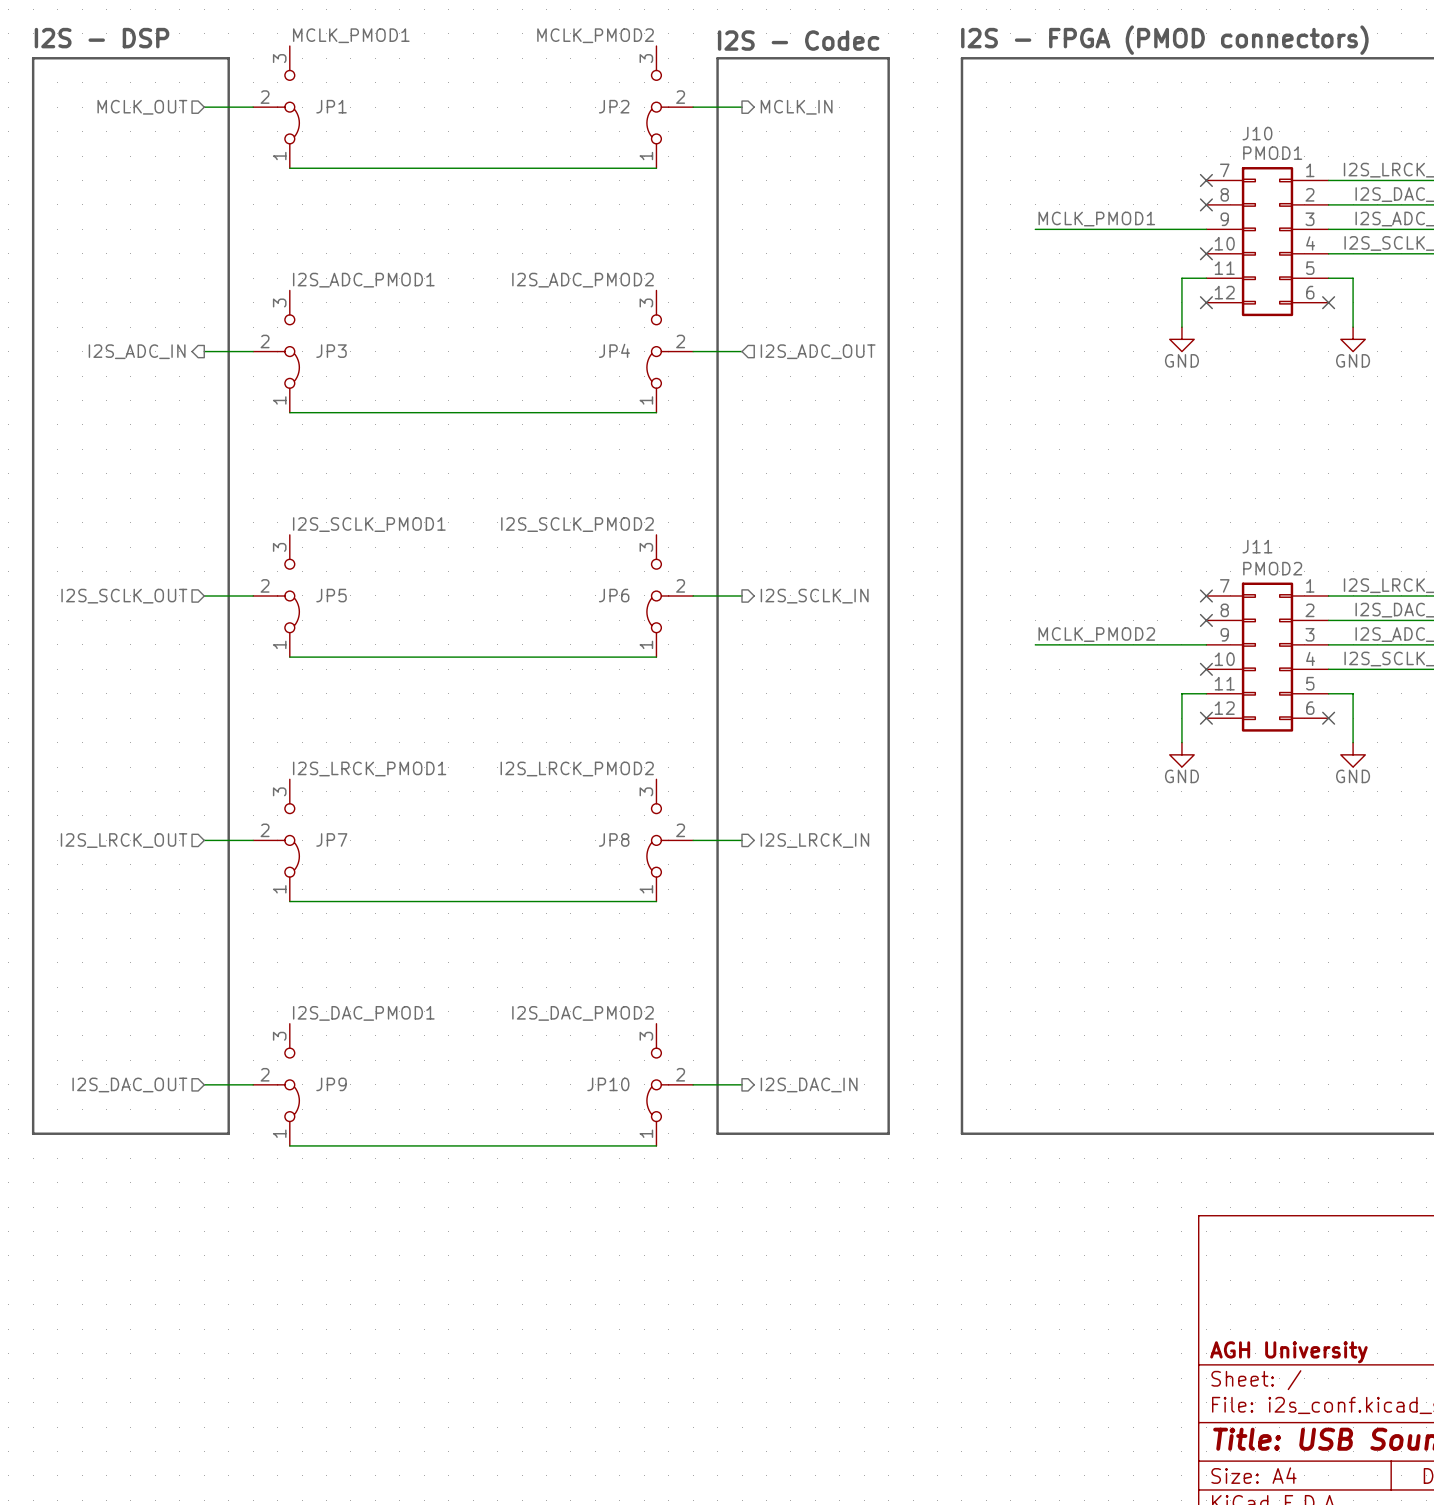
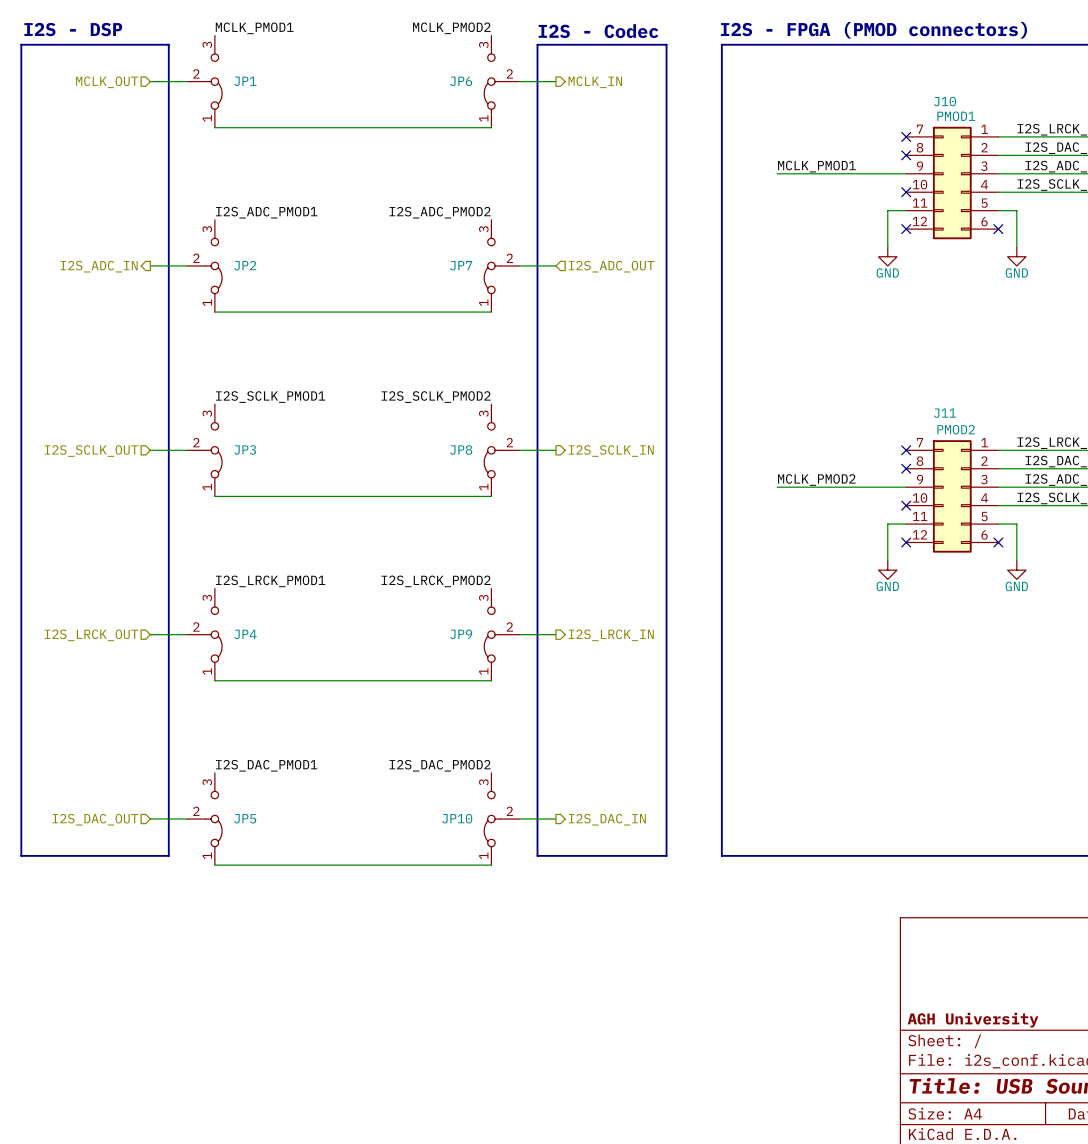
JP2 name: JP2 (614, 106) -> JP6 (461, 81)
JP4 name: JP4 (614, 350) -> JP7 (461, 265)
JP3 name: JP3 (331, 351) -> JP2 (245, 265)
JP5 name: JP5 (331, 595) -> JP3 (245, 449)
JP6 name: JP6 (614, 595) -> JP8 (461, 449)
JP7 name: JP7 (331, 839) -> JP4 (245, 634)
JP8 name: JP8 (614, 839) -> JP9 (461, 634)
JP9 name: JP9 (331, 1084) -> JP5 (245, 818)

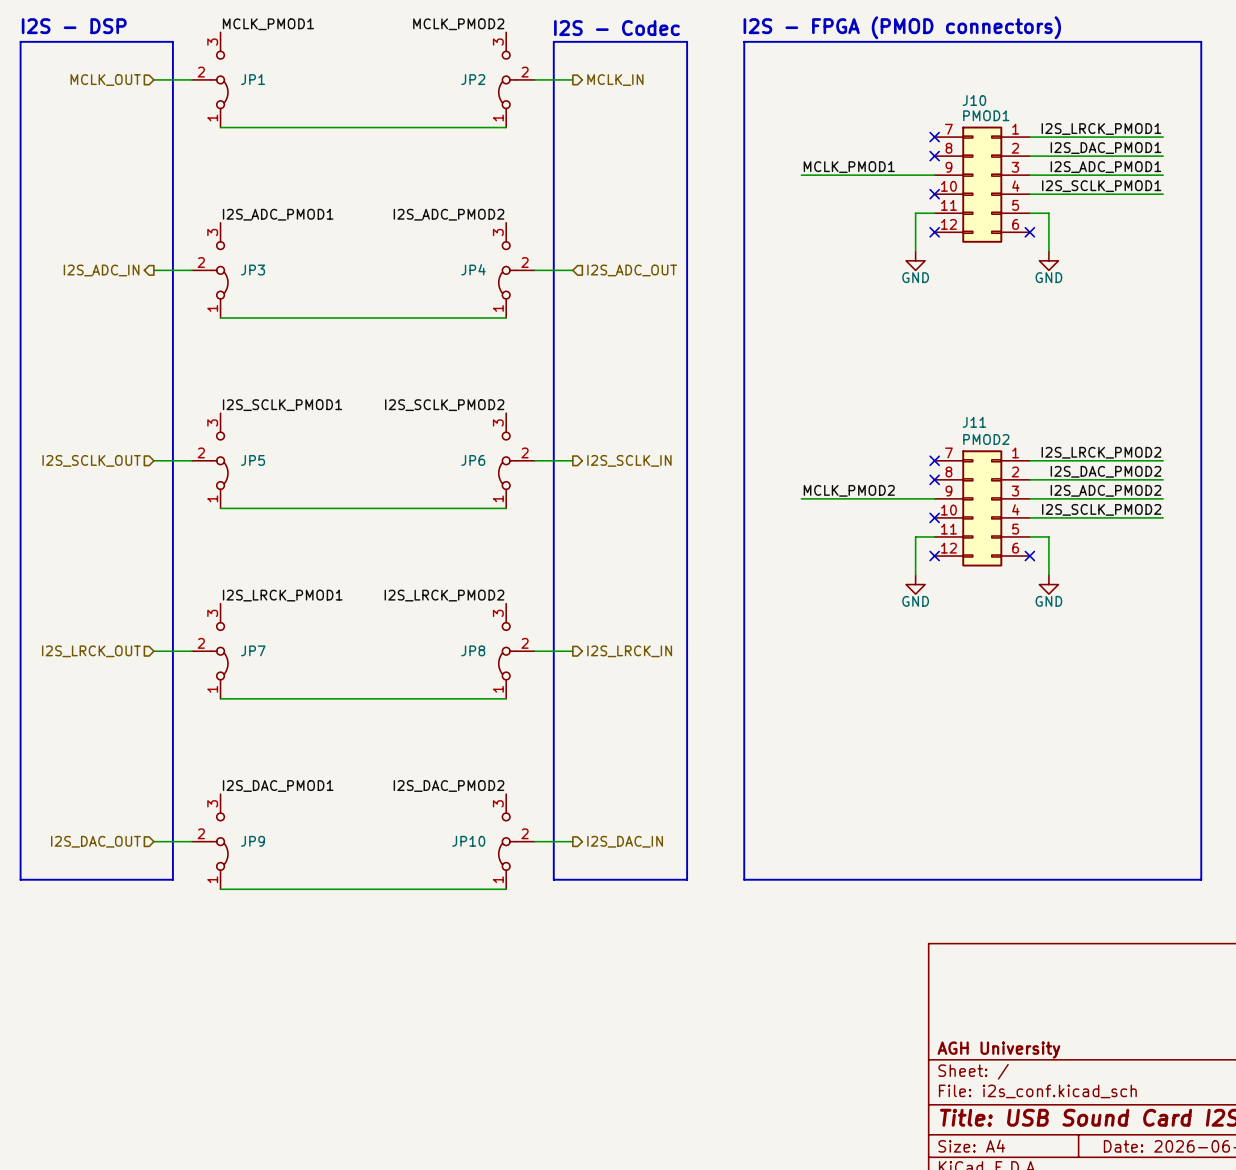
JP6 name: JP6 (461, 81) -> JP2 (473, 79)
JP2 name: JP2 (245, 265) -> JP3 (253, 270)
JP7 name: JP7 (461, 265) -> JP4 (473, 269)
JP3 name: JP3 (245, 449) -> JP5 (253, 460)
JP8 name: JP8 (461, 449) -> JP6 (473, 460)
JP4 name: JP4 (245, 634) -> JP7 (253, 650)
JP9 name: JP9 (461, 634) -> JP8 (473, 650)
JP5 name: JP5 (245, 818) -> JP9 (253, 841)

